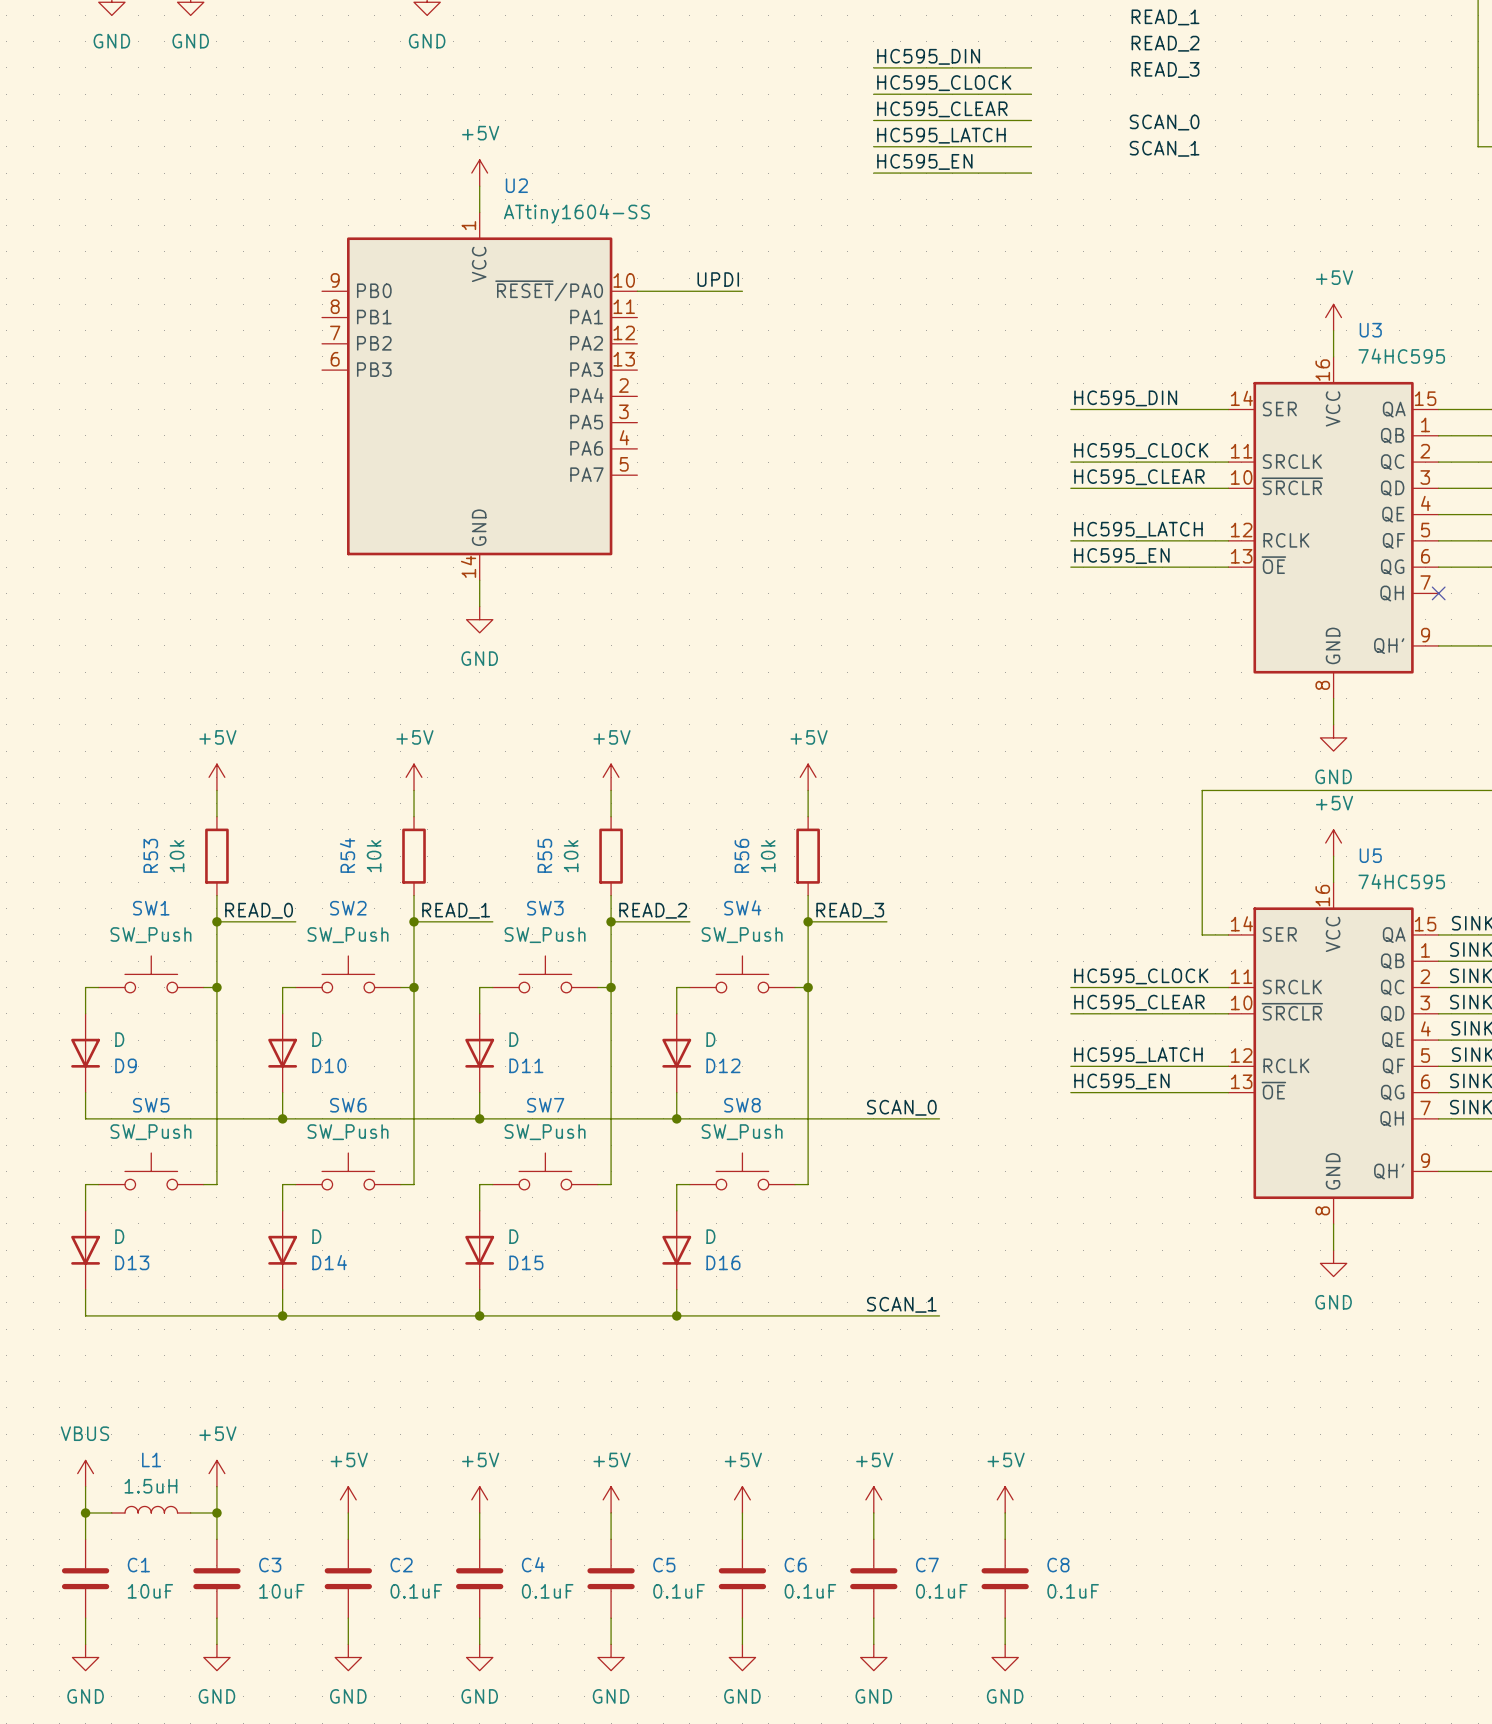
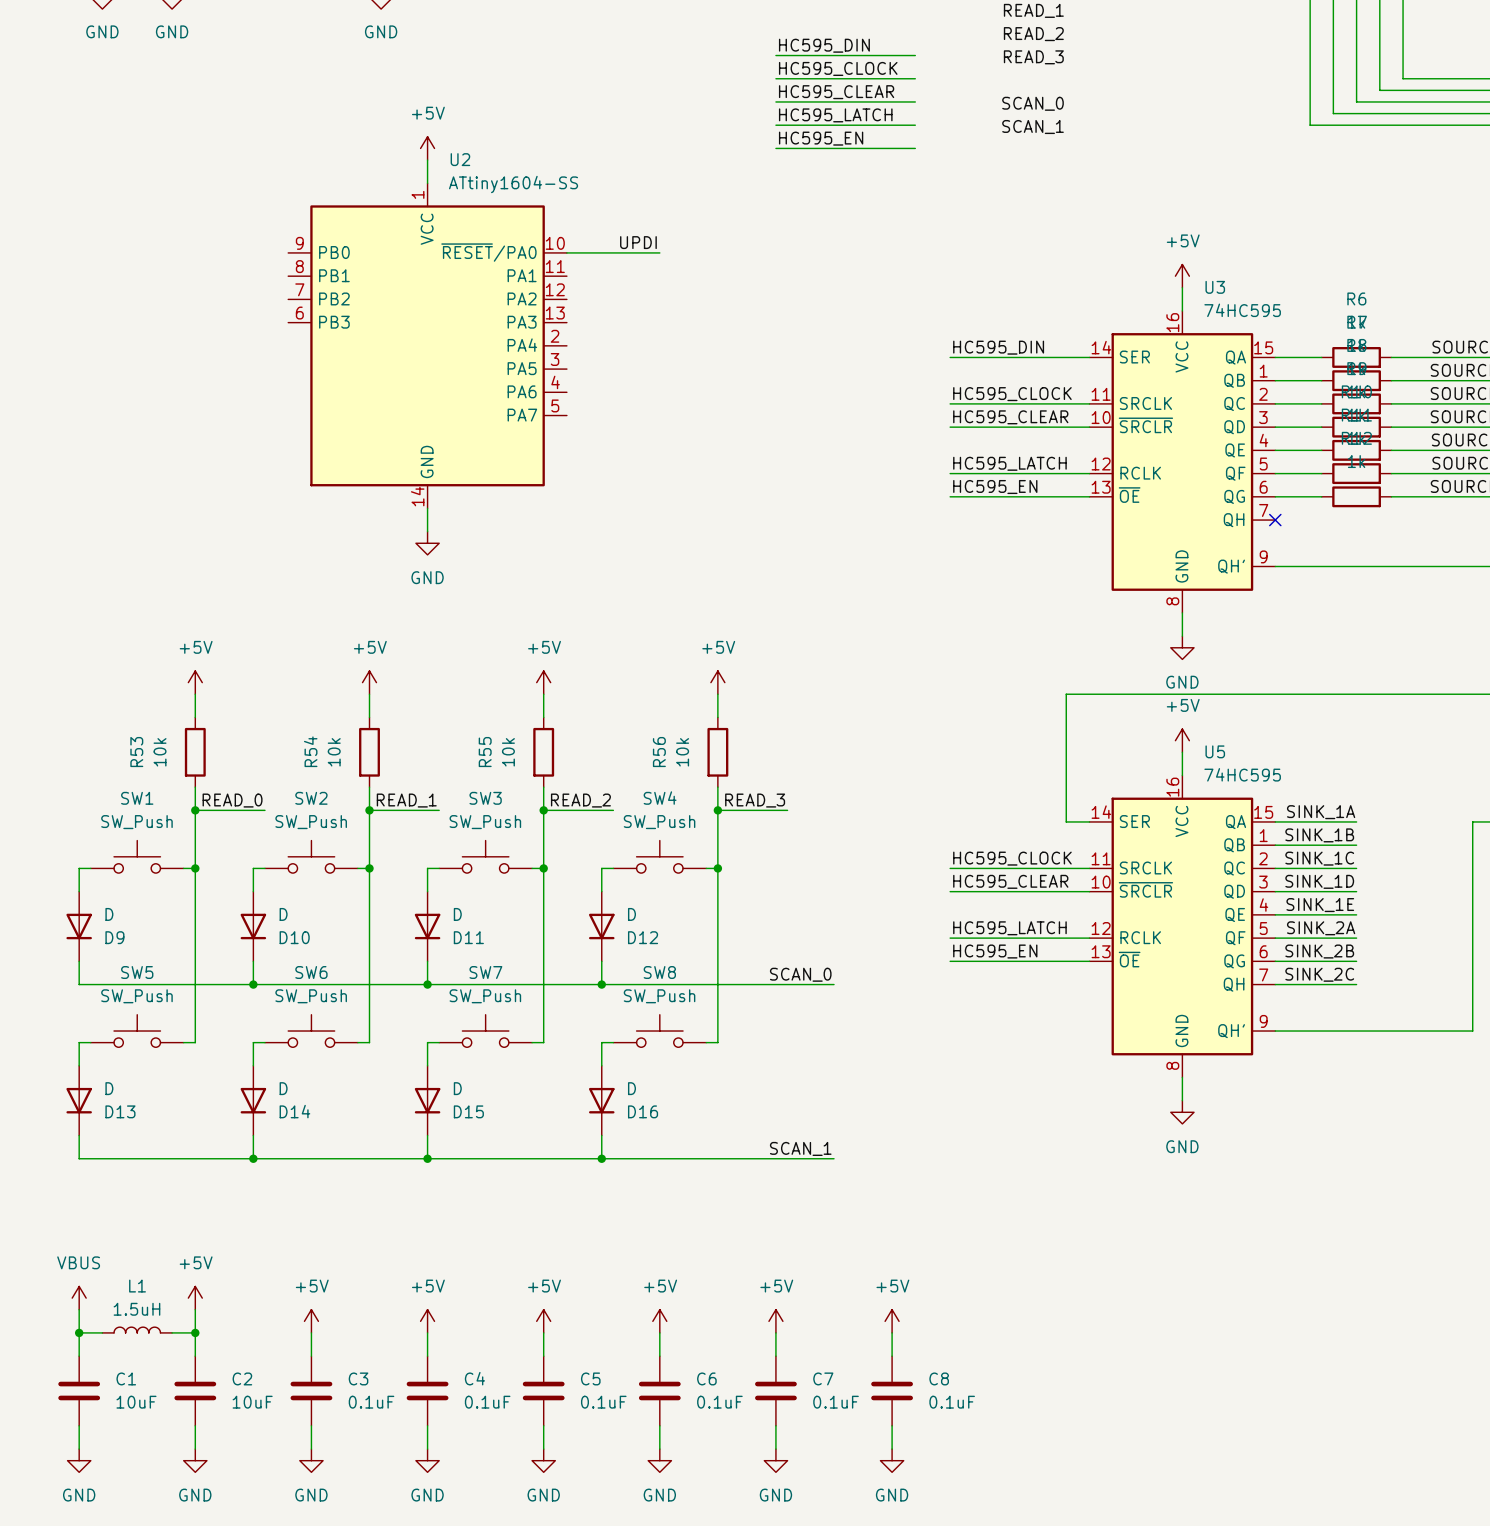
C3 name: C3 (270, 1565) -> C2 (242, 1378)
C2 name: C2 (401, 1565) -> C3 (358, 1378)

